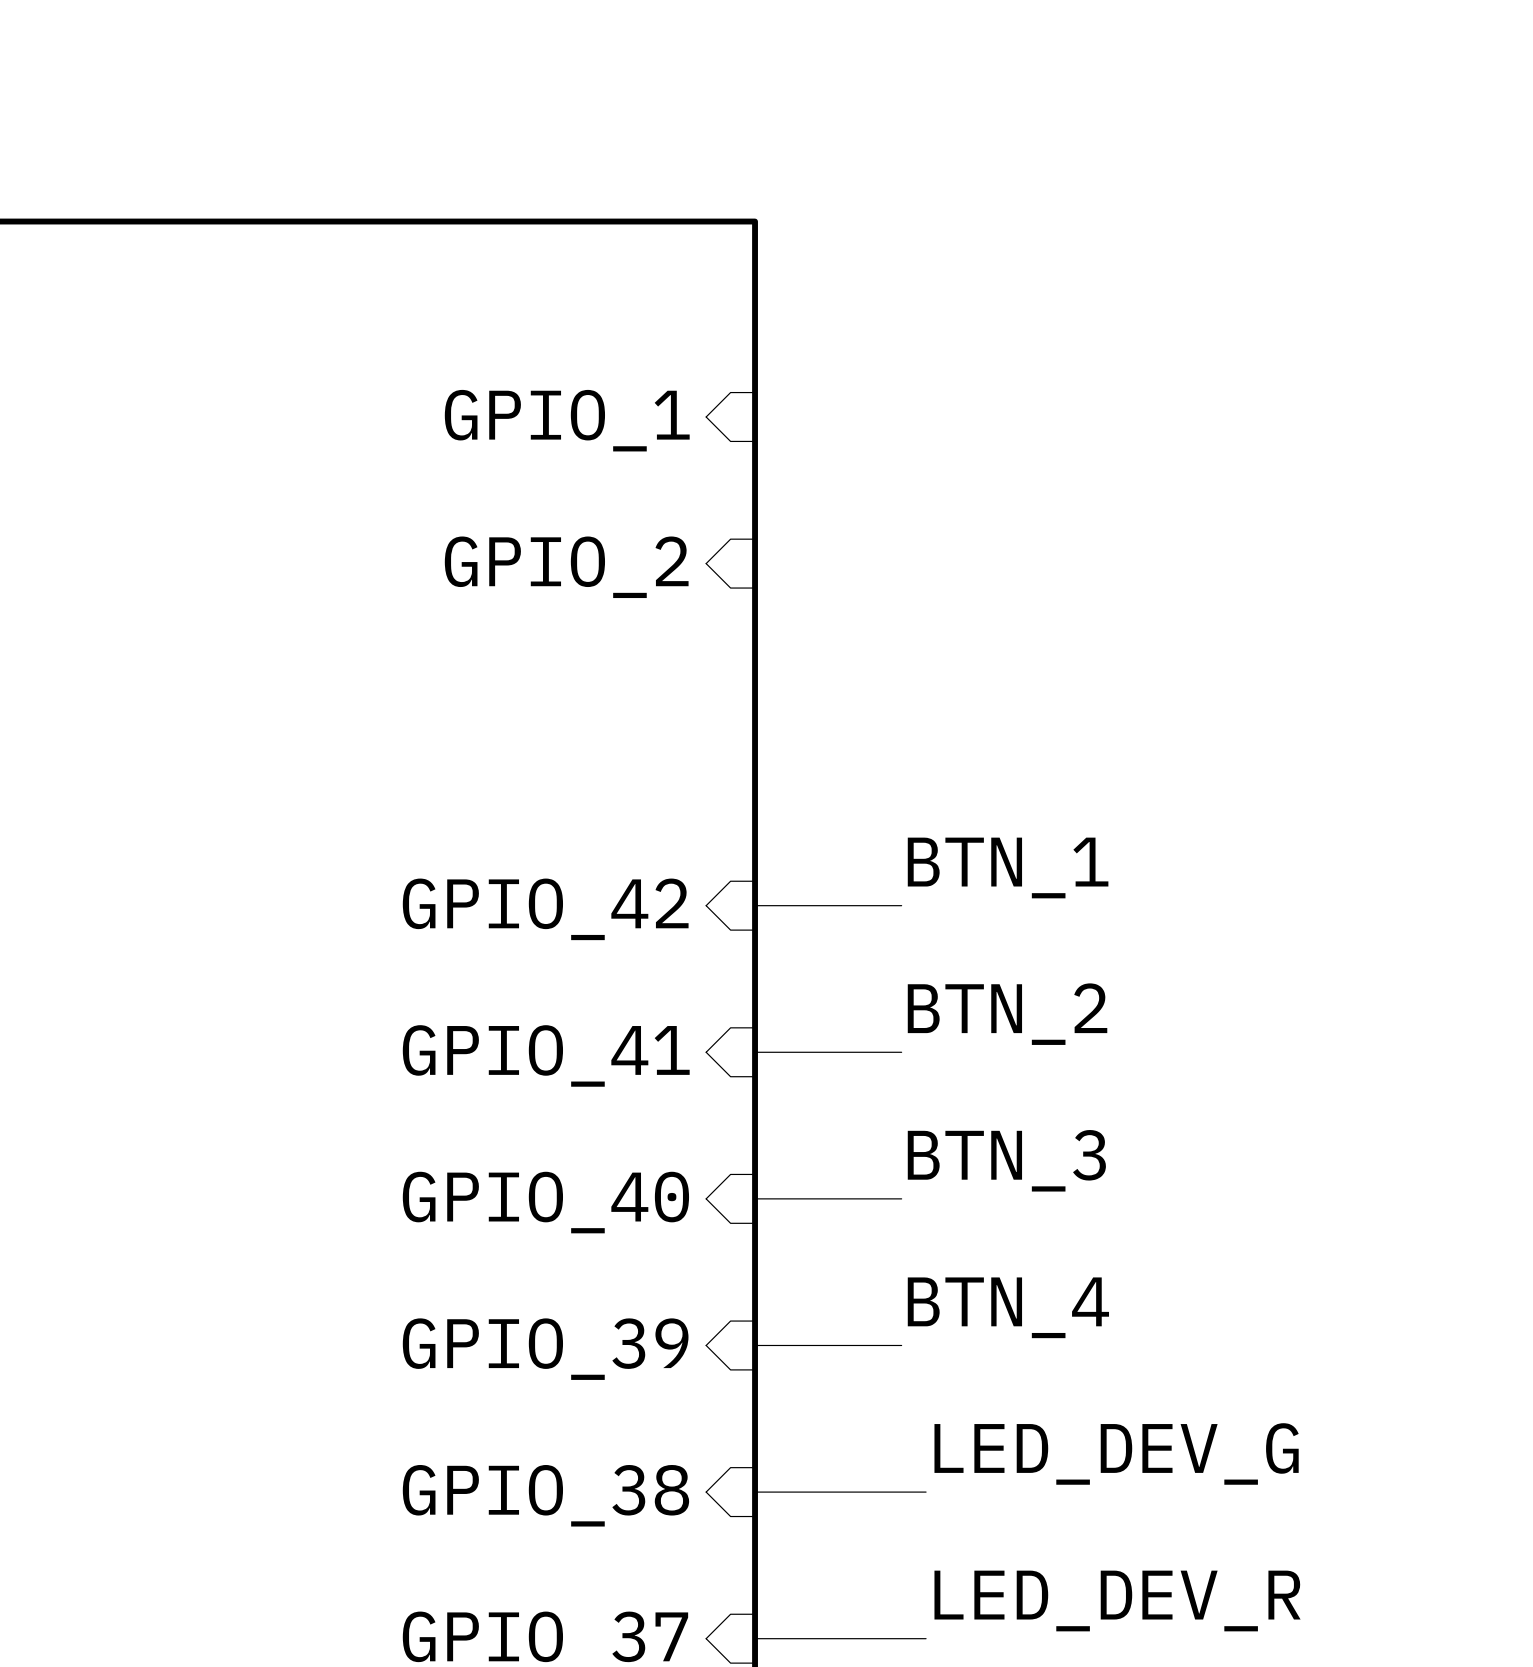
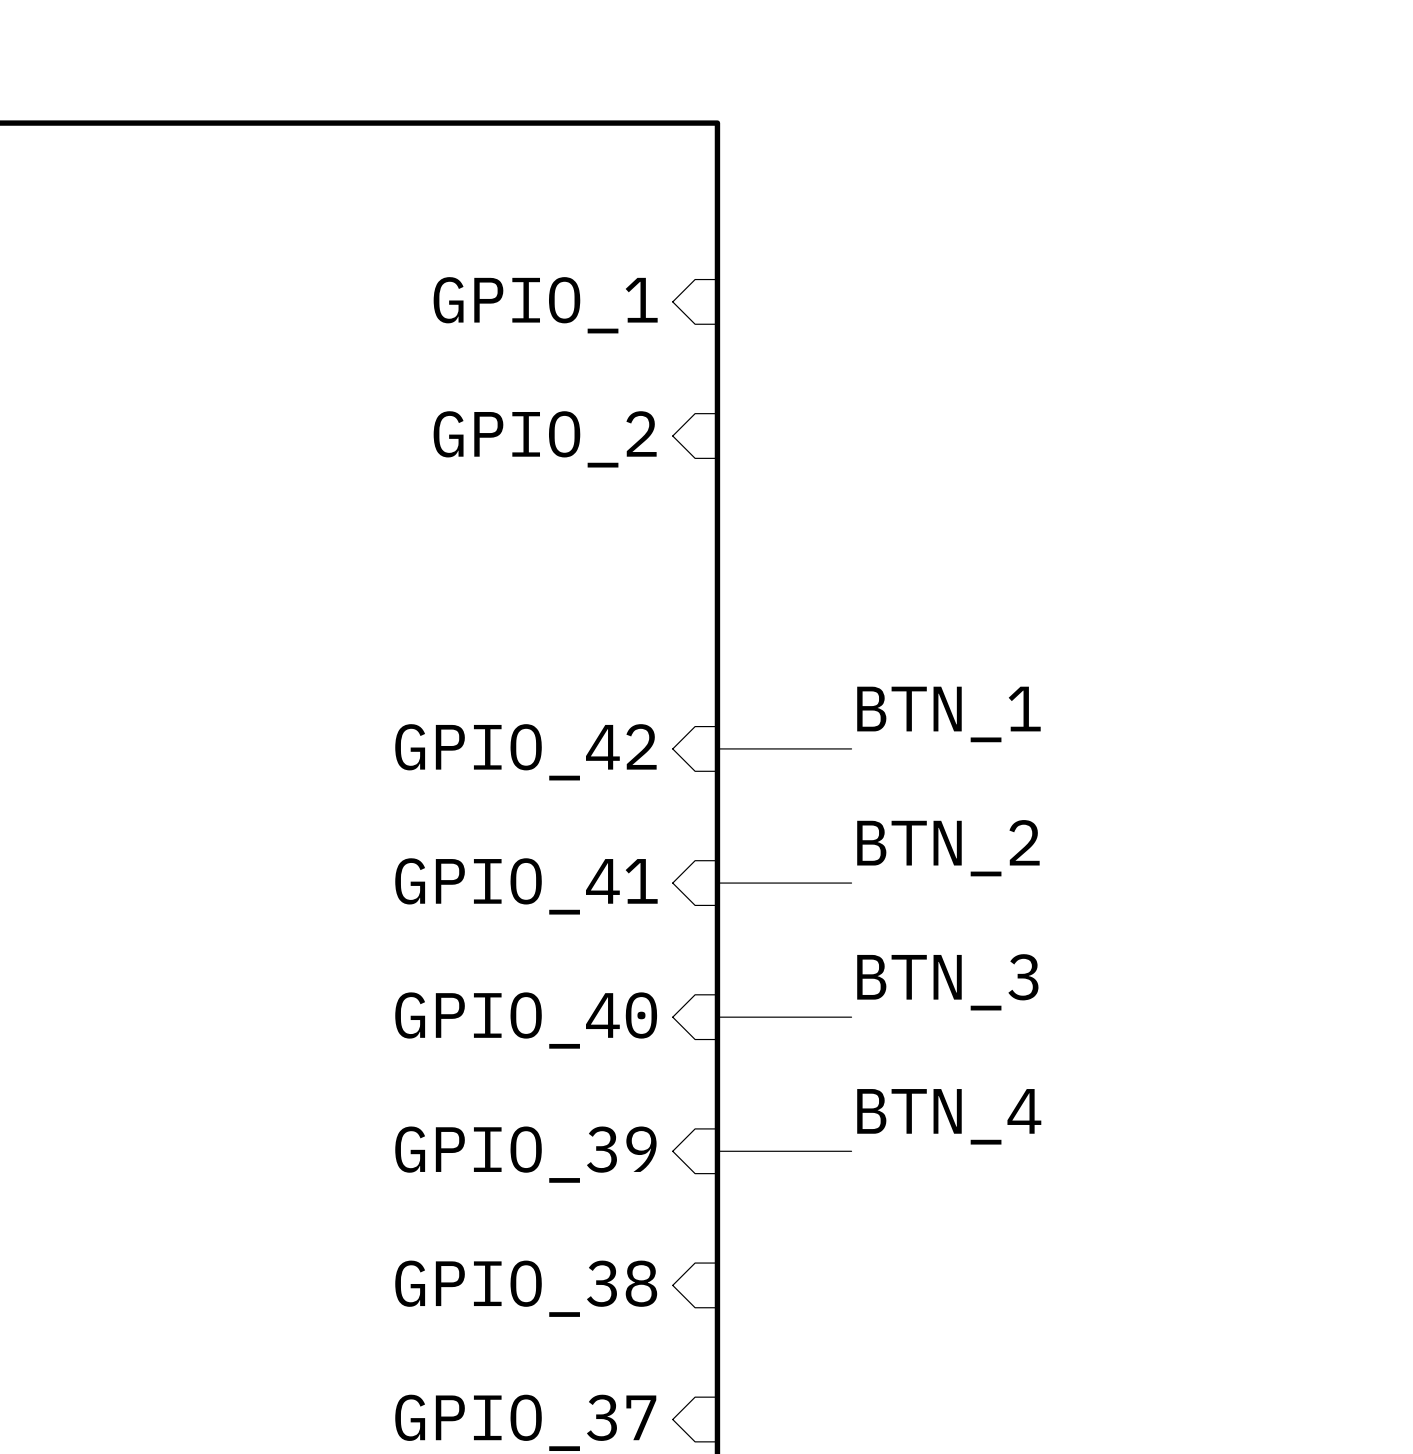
label: LED_DEV_G (1116, 1453) -> none
wire: (755, 1492) (926, 1492) -> none
label: LED_DEV_R (1117, 1600) -> none
wire: (755, 1638) (926, 1638) -> none

